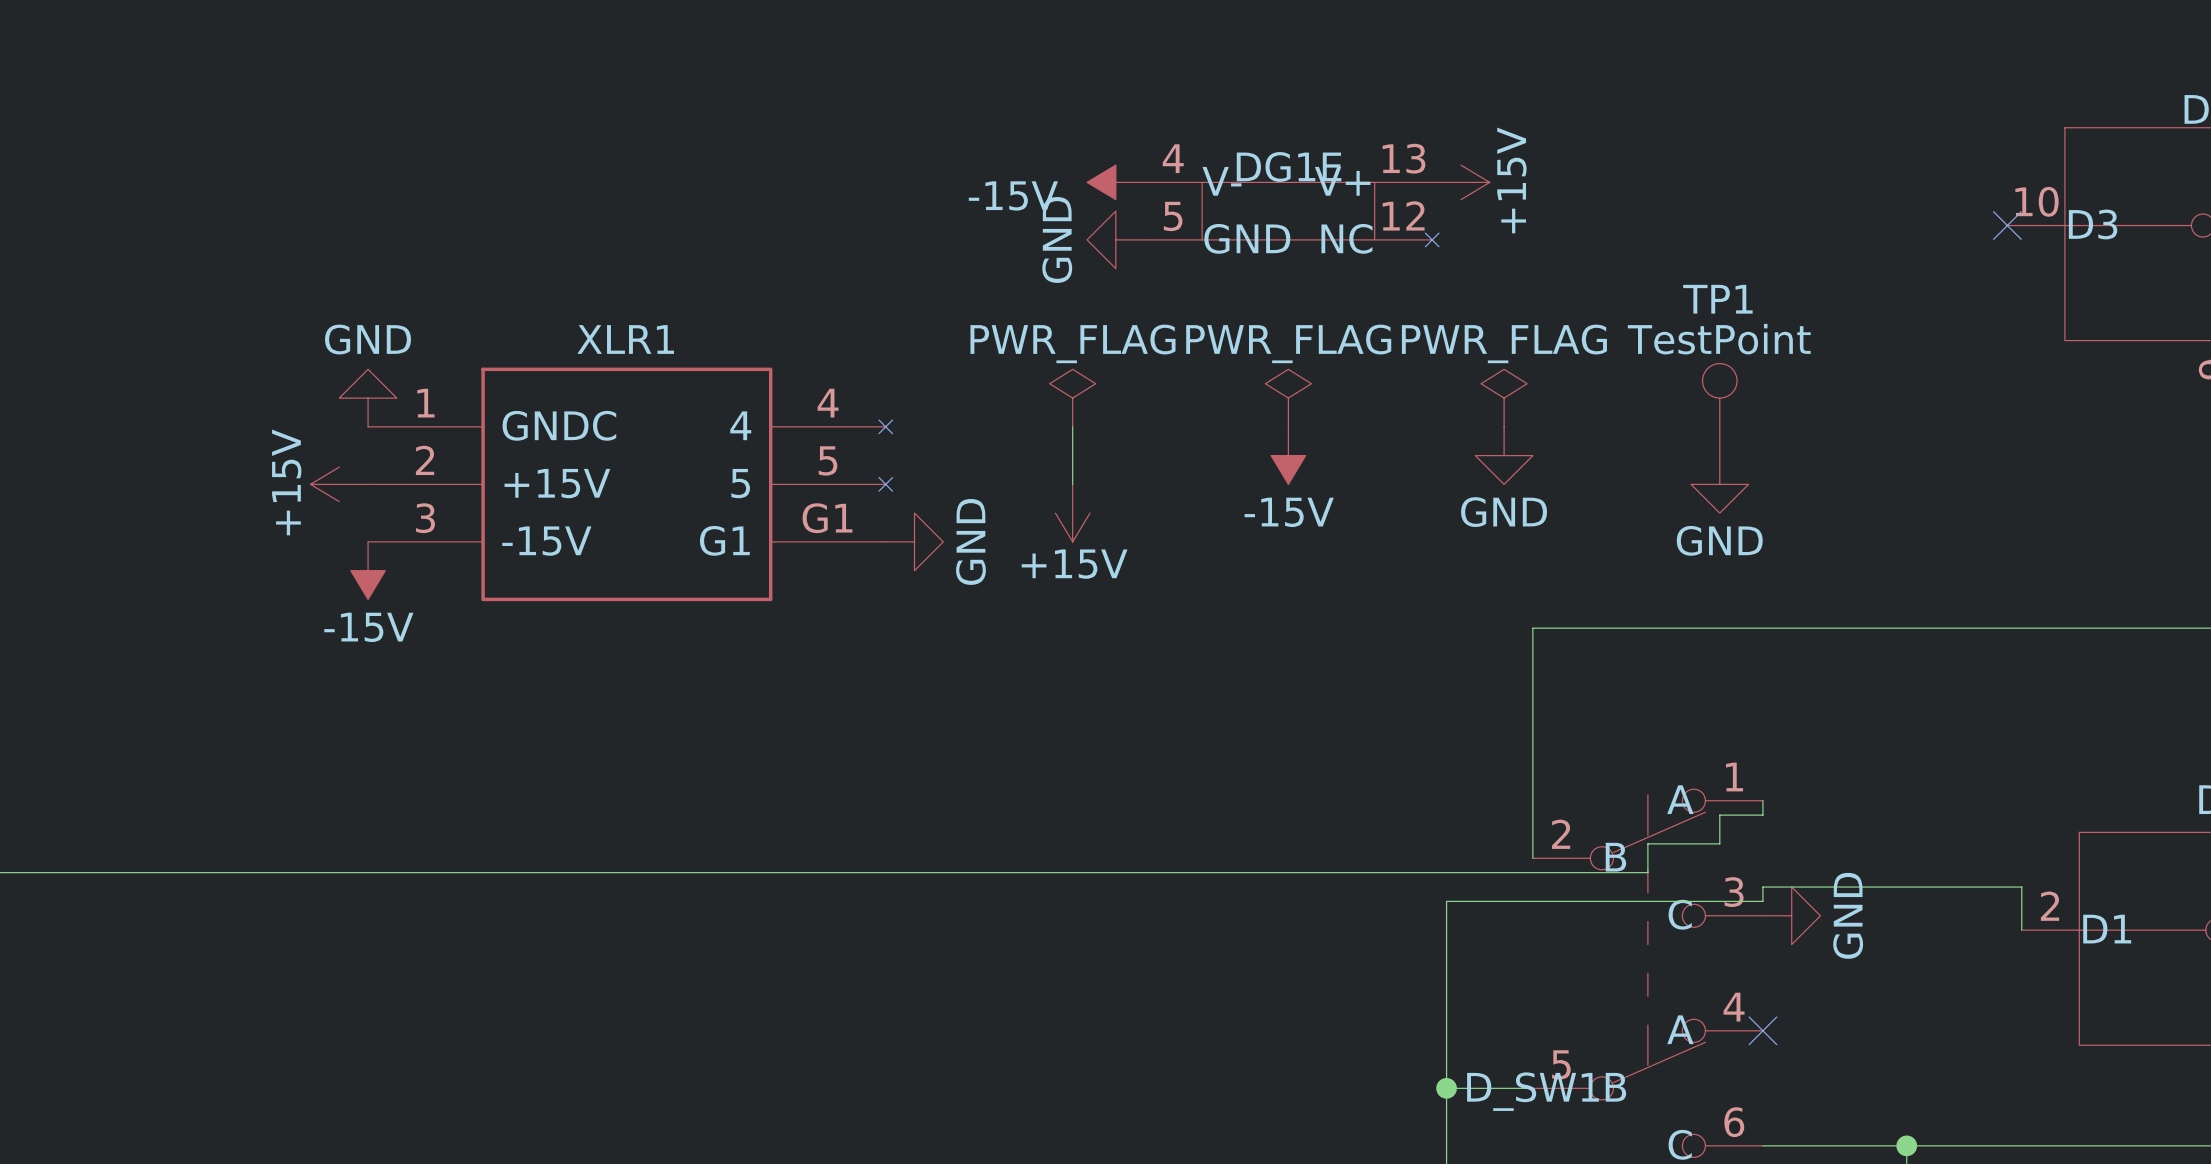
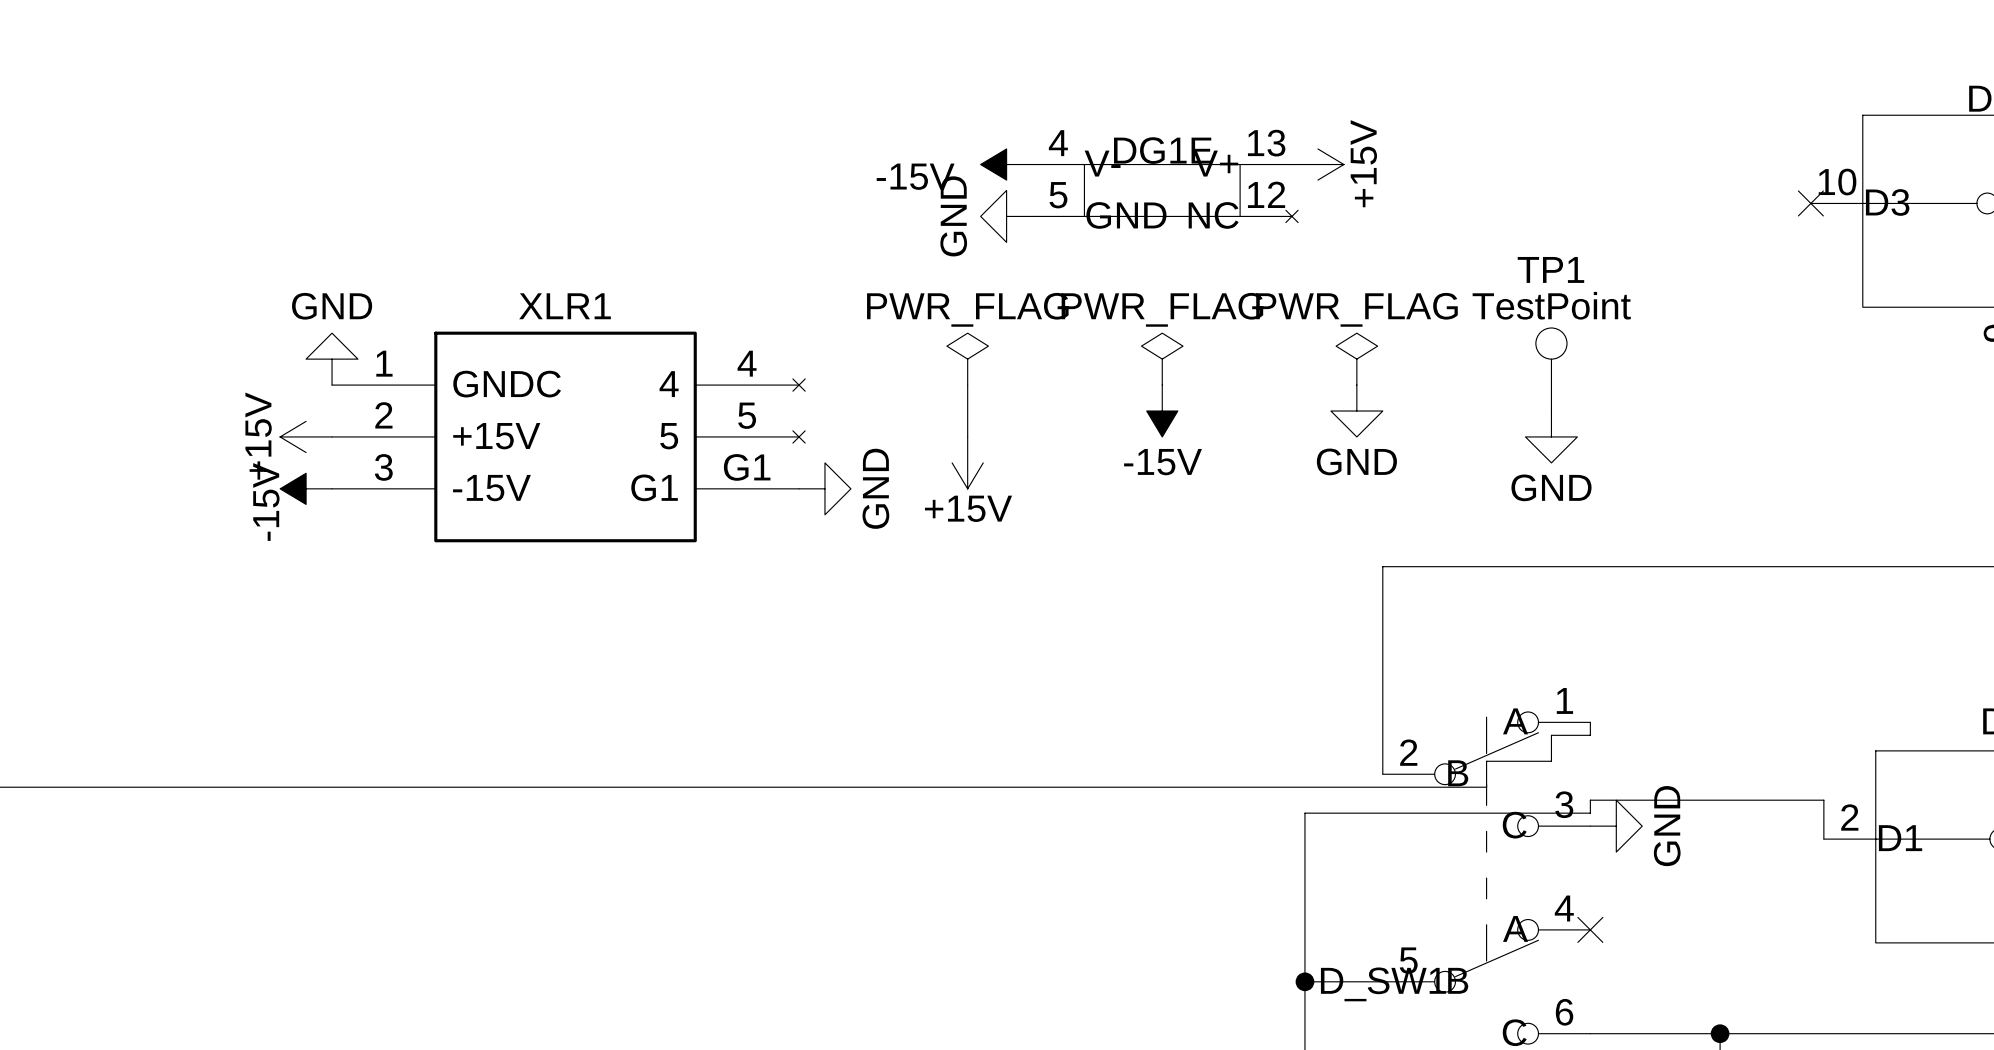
power symbol rotation: 0° (368, 570) -> 90° clockwise (306, 488)
power symbol position: -15V (368, 570) -> -15V (306, 488)

